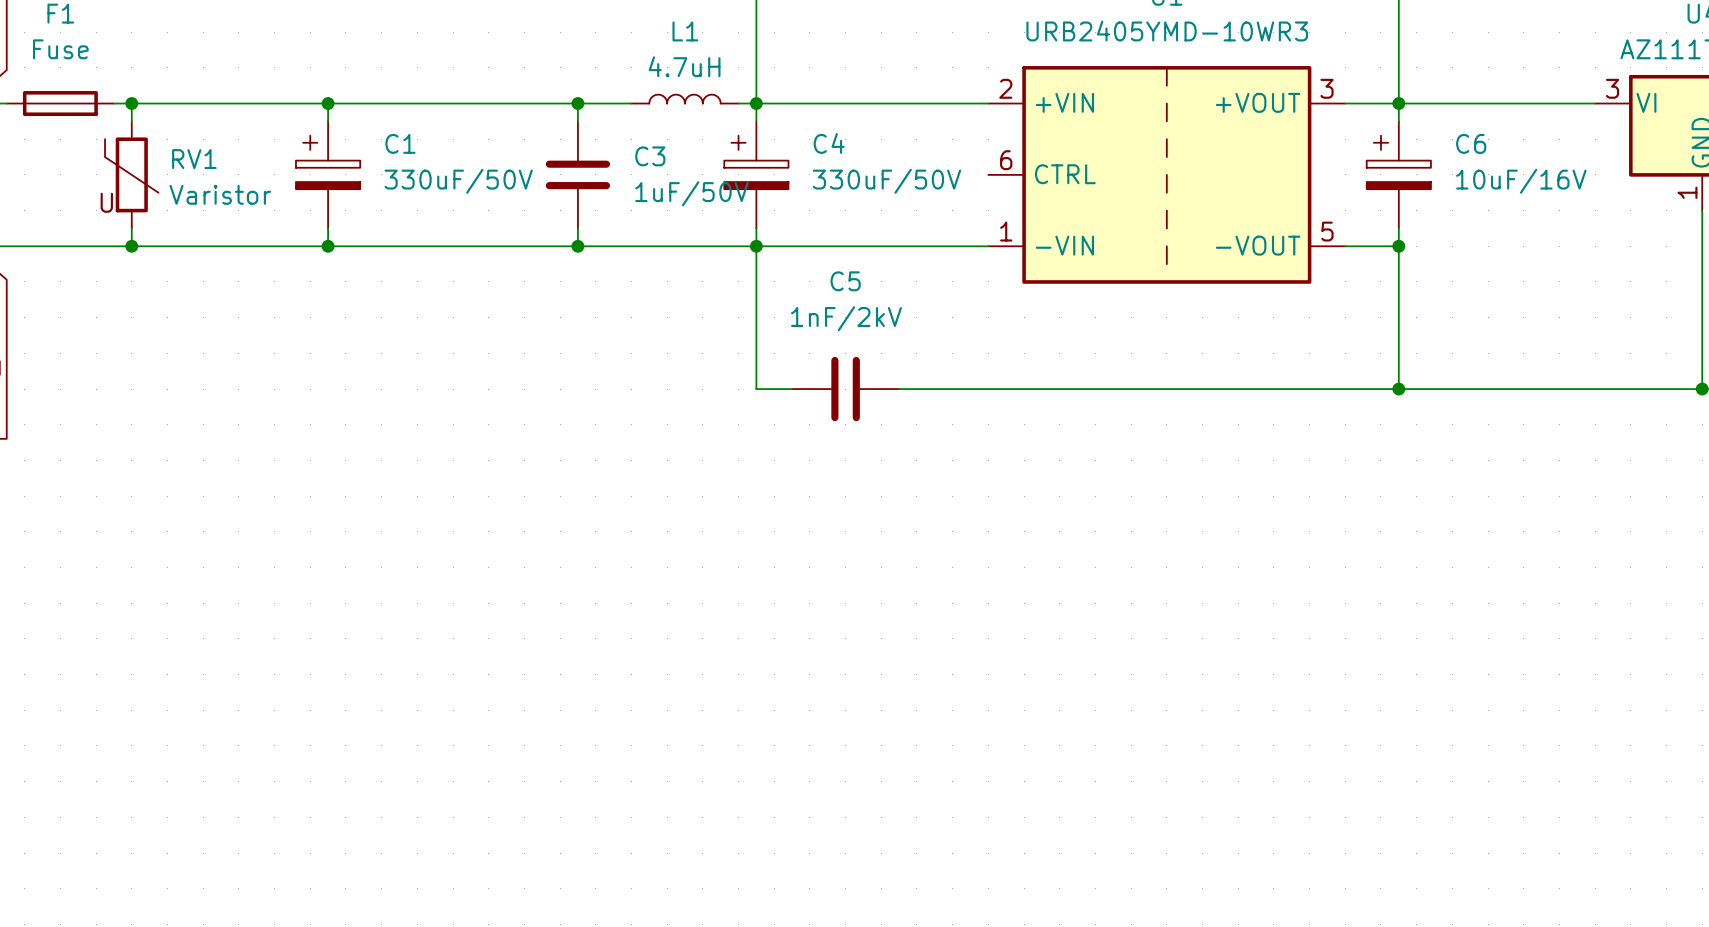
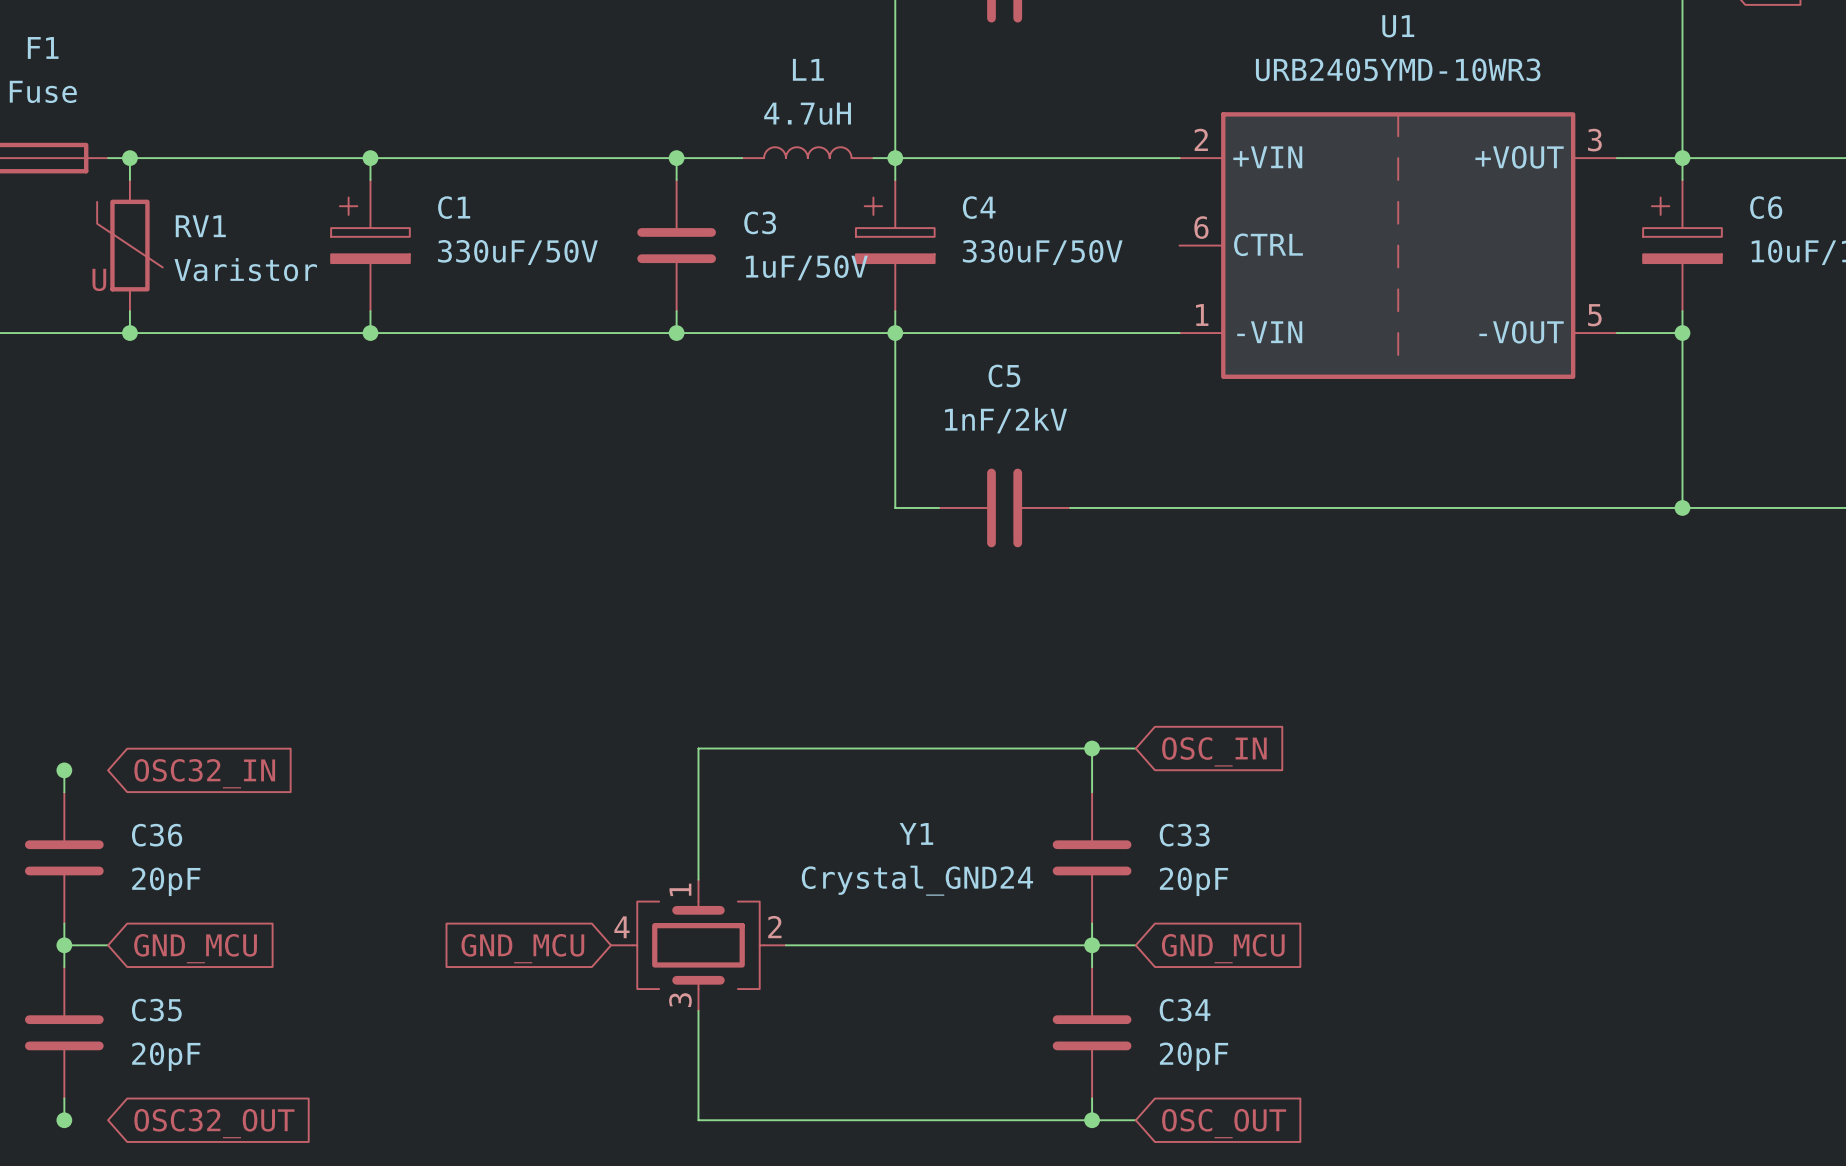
wire: none -> (1092, 748) (1092, 792)
junction: none -> (1092, 748)
wire: none -> (1135, 748) (698, 748) (698, 879)
global label: none -> OSC_IN (1214, 751)
wire: none -> (64, 770) (64, 792)
junction: none -> (64, 770)
global label: none -> OSC32_IN (204, 773)
C36: none -> 20pF (64, 857)
C33: none -> 20pF (1092, 857)
wire: none -> (64, 923) (64, 967)
wire: none -> (1092, 923) (1092, 967)
wire: none -> (64, 945) (108, 945)
junction: none -> (64, 945)
Y1: none -> Crystal_GND24 (698, 945)
wire: none -> (785, 945) (1135, 945)
junction: none -> (1092, 945)
global label: none -> GND_MCU (195, 948)
global label: none -> GND_MCU (522, 948)
global label: none -> GND_MCU (1223, 948)
wire: none -> (698, 1010) (698, 1120) (1135, 1120)
C35: none -> 20pF (64, 1032)
C34: none -> 20pF (1092, 1032)
wire: none -> (64, 1098) (64, 1120)
wire: none -> (1092, 1098) (1092, 1120)
junction: none -> (64, 1120)
junction: none -> (1092, 1120)
global label: none -> OSC32_OUT (214, 1123)
global label: none -> OSC_OUT (1224, 1123)

